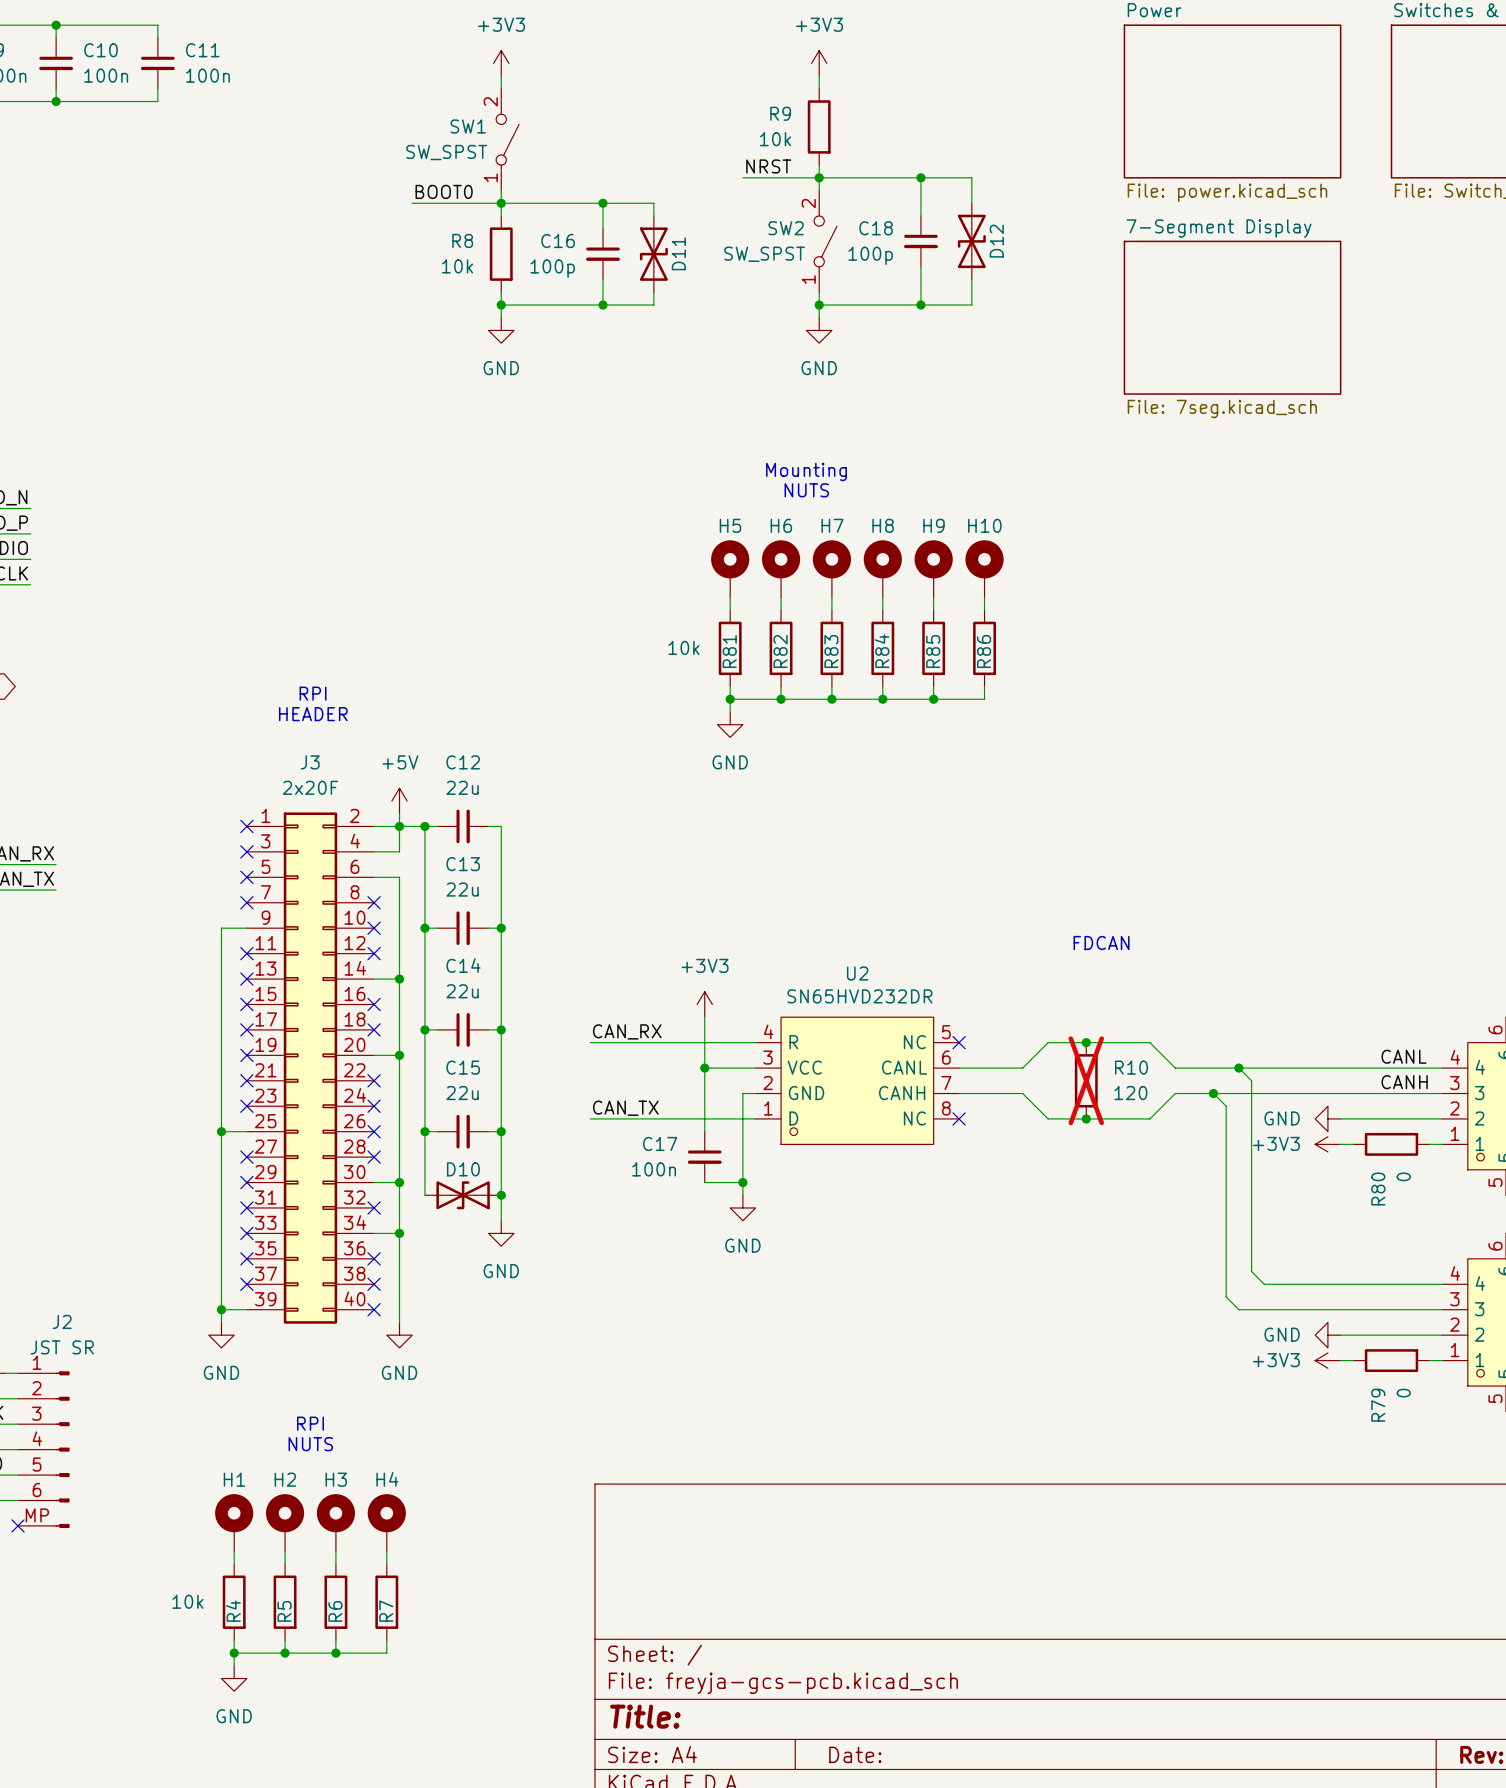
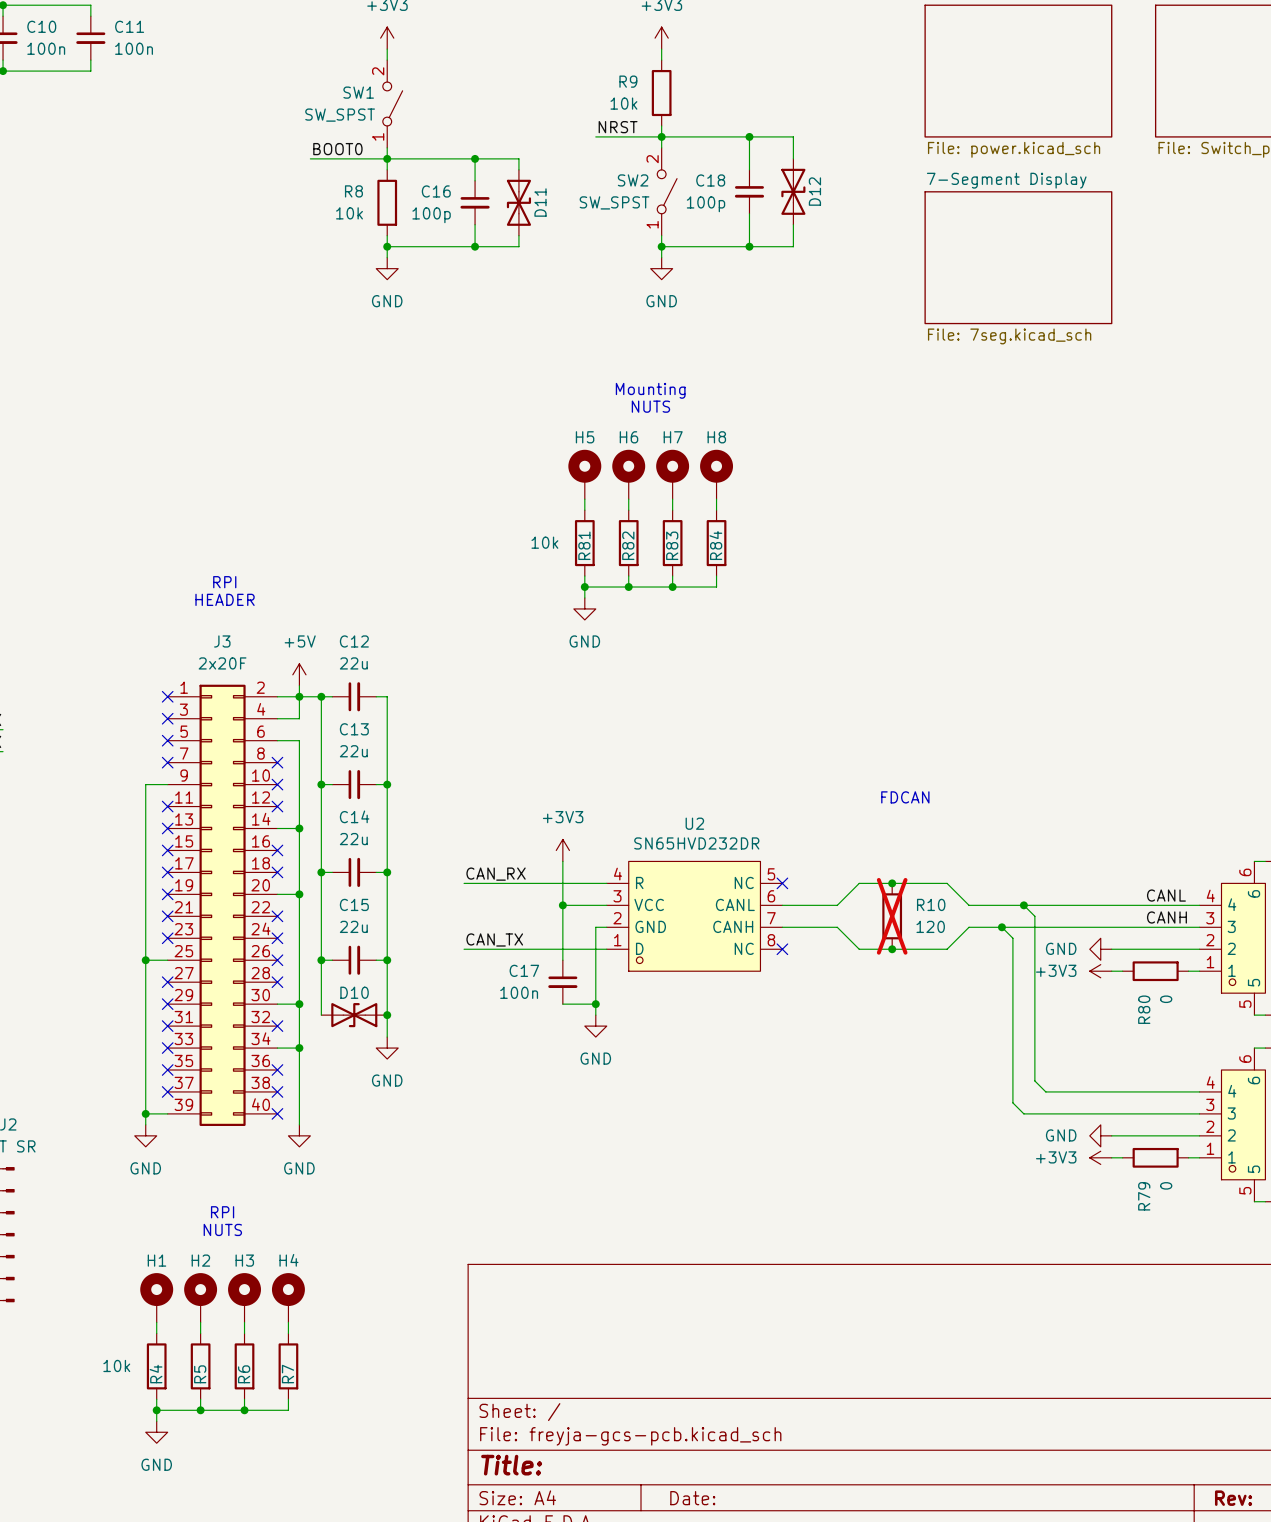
H9: (933, 568) -> none
H10: (984, 568) -> none
wire: (933, 597) (933, 610) -> none
wire: (984, 597) (984, 610) -> none
R85: (933, 648) -> none
R86: (984, 648) -> none
wire: (933, 686) (933, 699) -> none
wire: (984, 686) (984, 699) (882, 699) -> none
junction: (882, 699) -> none
junction: (933, 699) -> none

